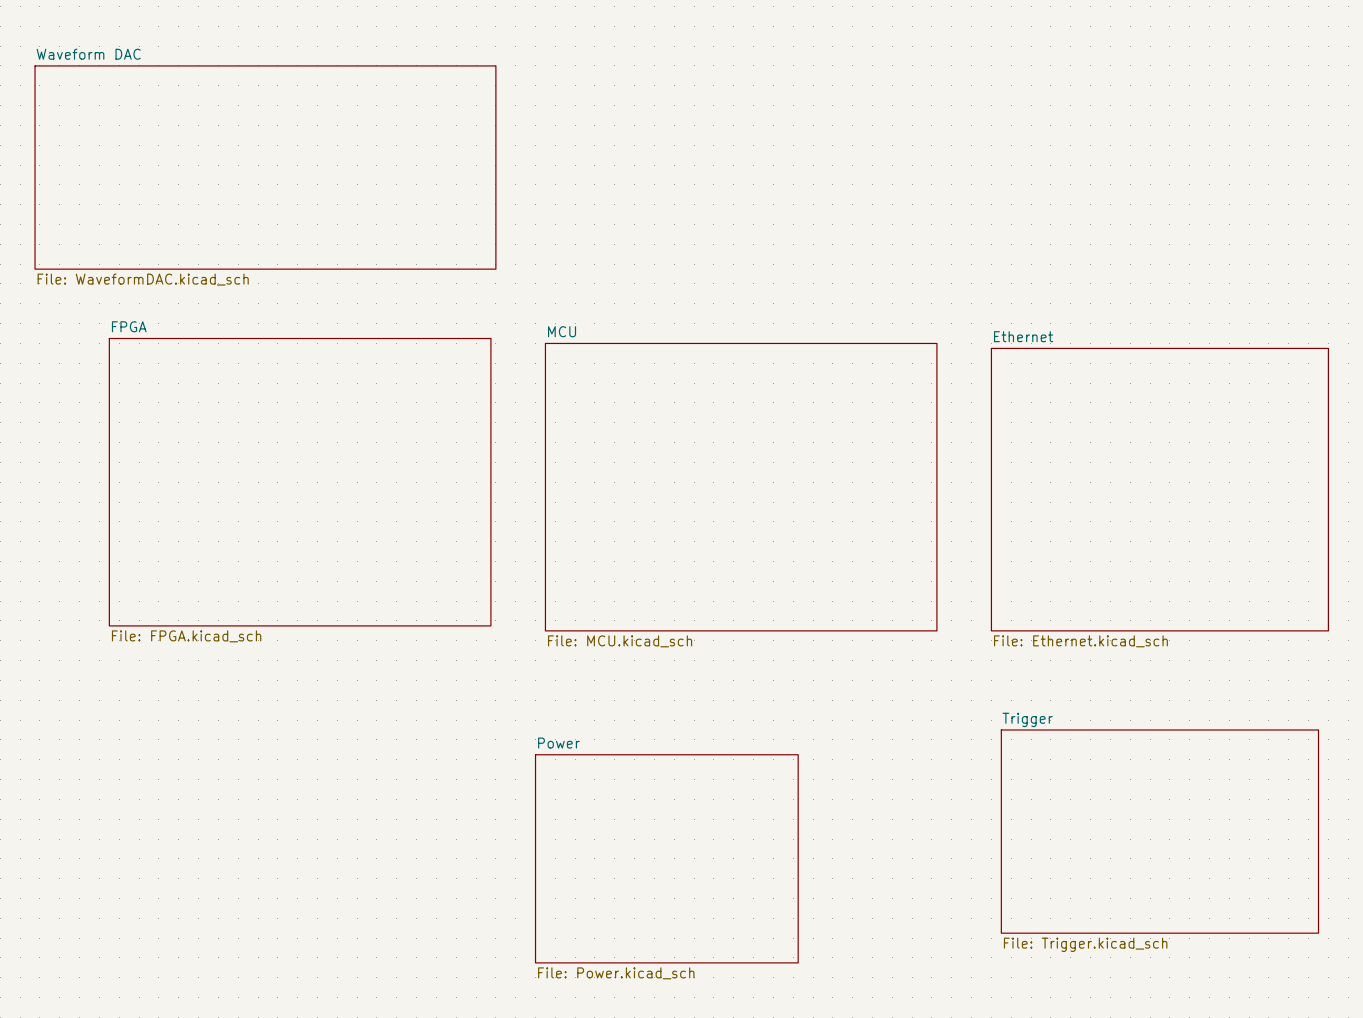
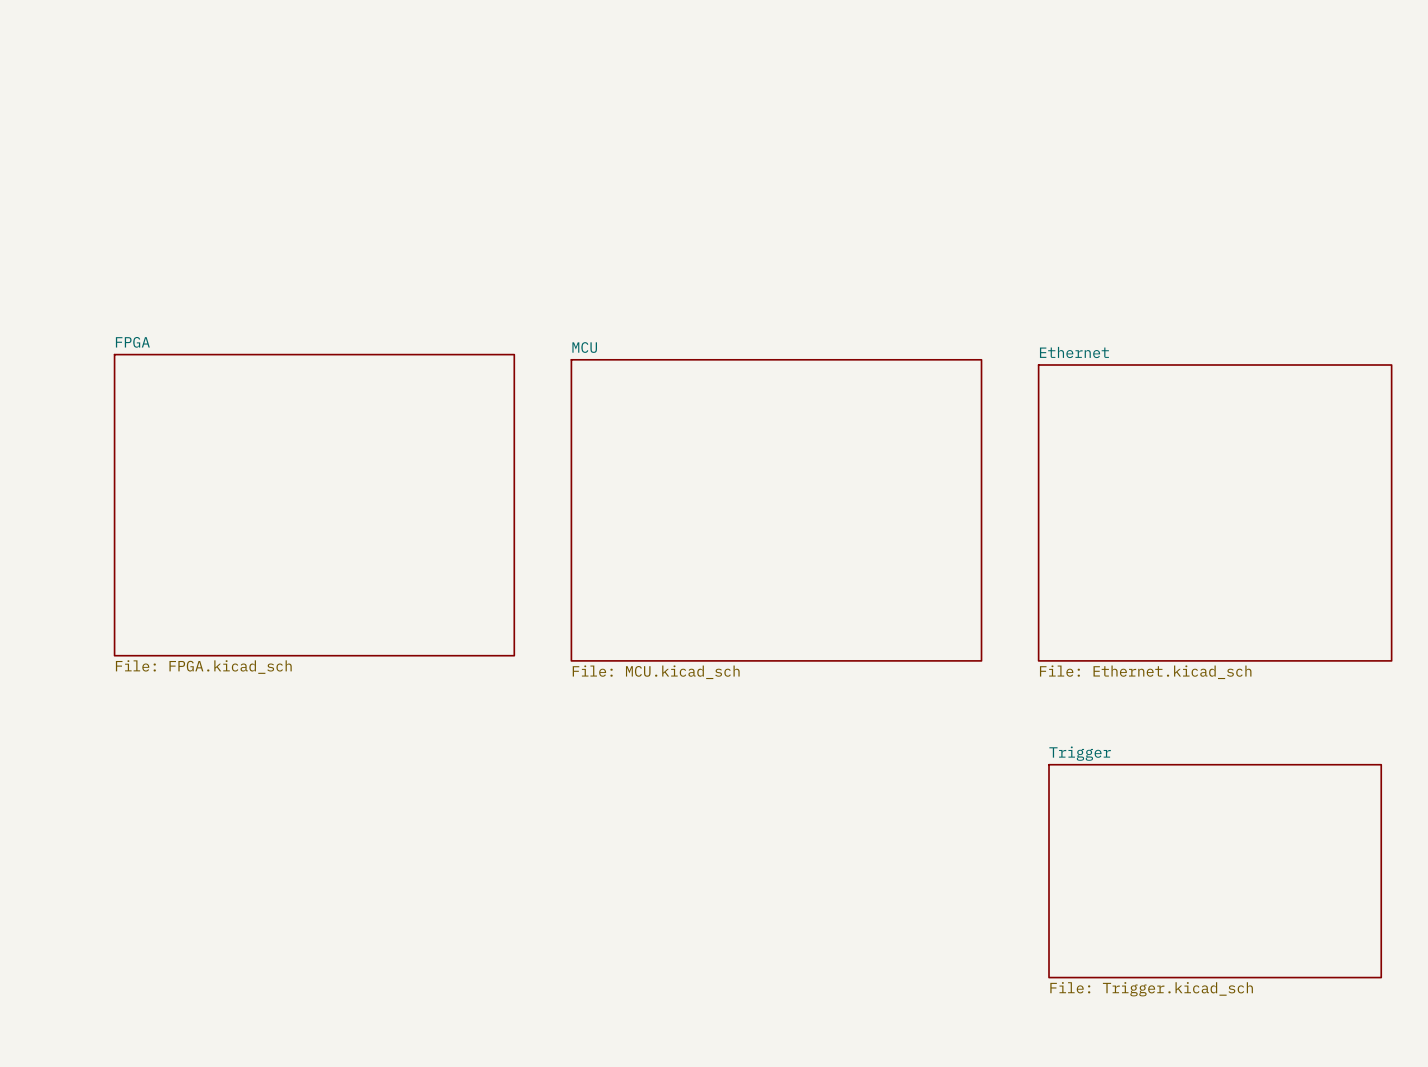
sheet Waveform DAC: File: WaveformDAC.kicad_sch (265, 167) -> none
sheet Power: File: Power.kicad_sch (666, 858) -> none

